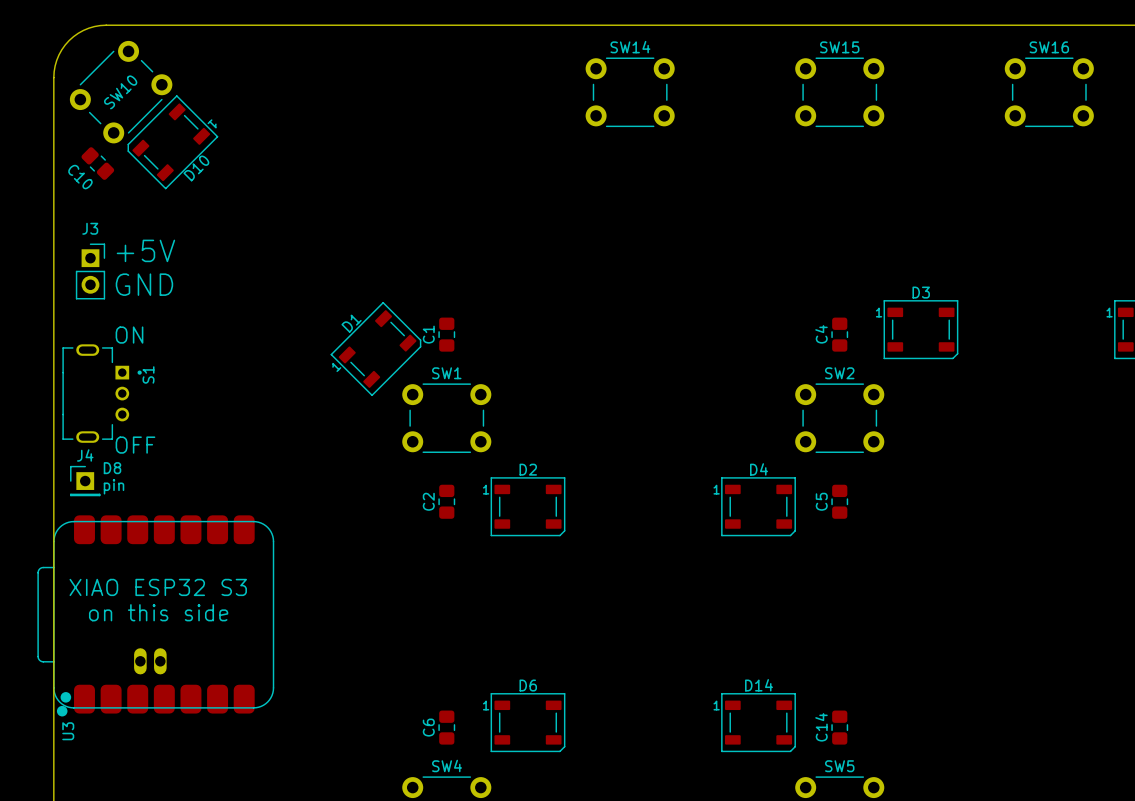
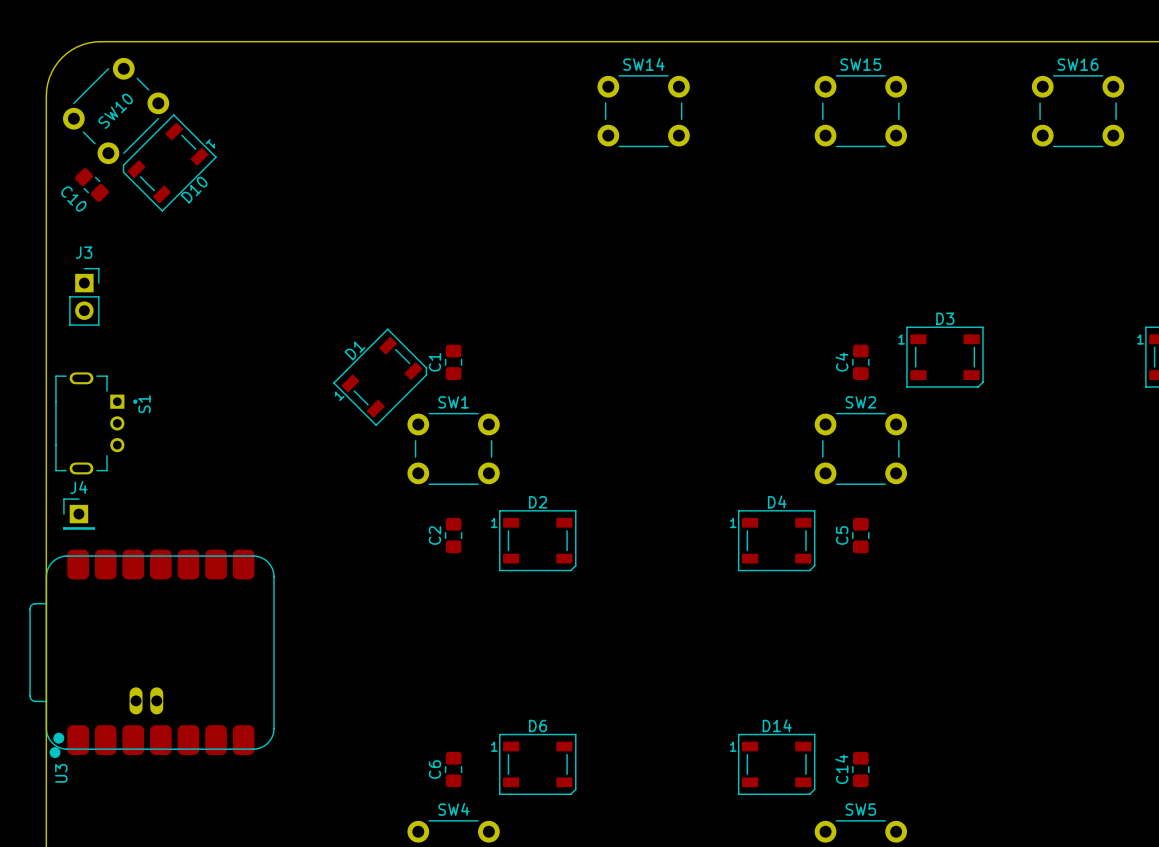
text: +5V (145, 250) -> none
text: GND (144, 284) -> none
text: ON (129, 335) -> none
text: OFF (135, 445) -> none
text: D8 (112, 468) -> none
text: pin (114, 486) -> none
text: XIAO ESP32 S3 (158, 587) -> none
text: on this side (158, 612) -> none

